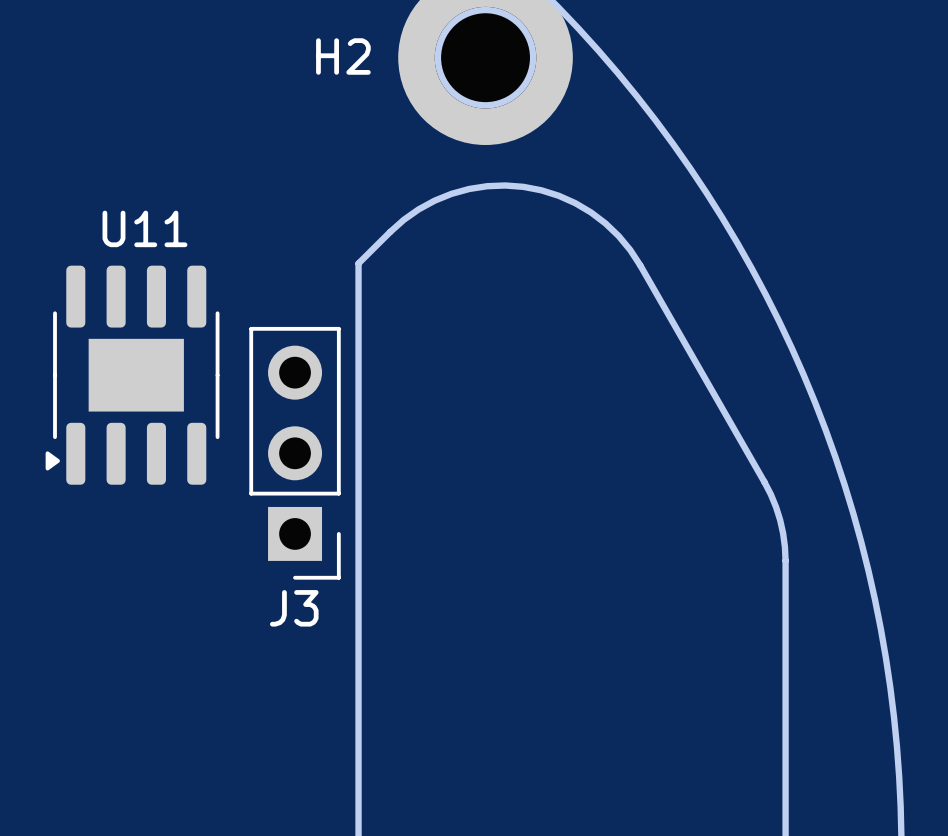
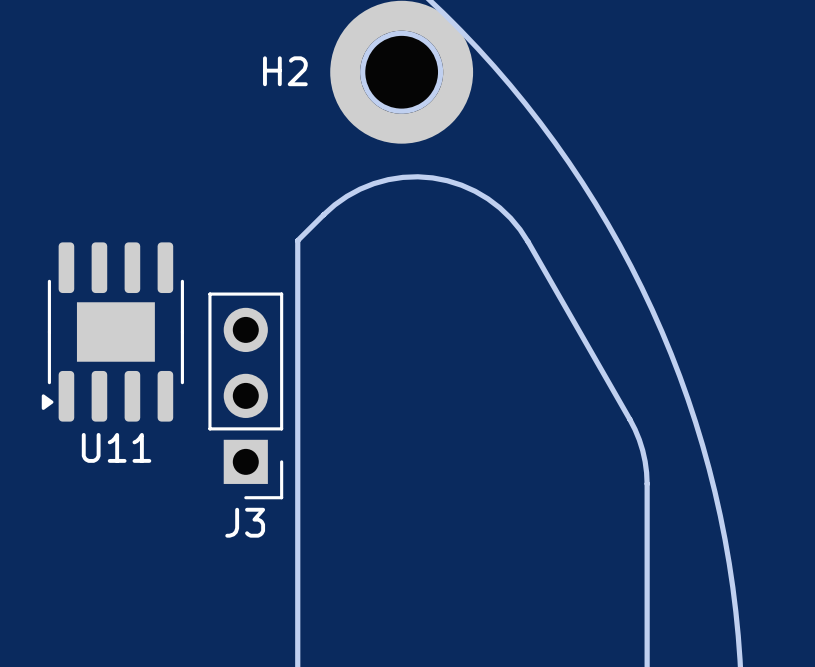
U11 name position: U11 (144, 228) -> U11 (116, 447)

